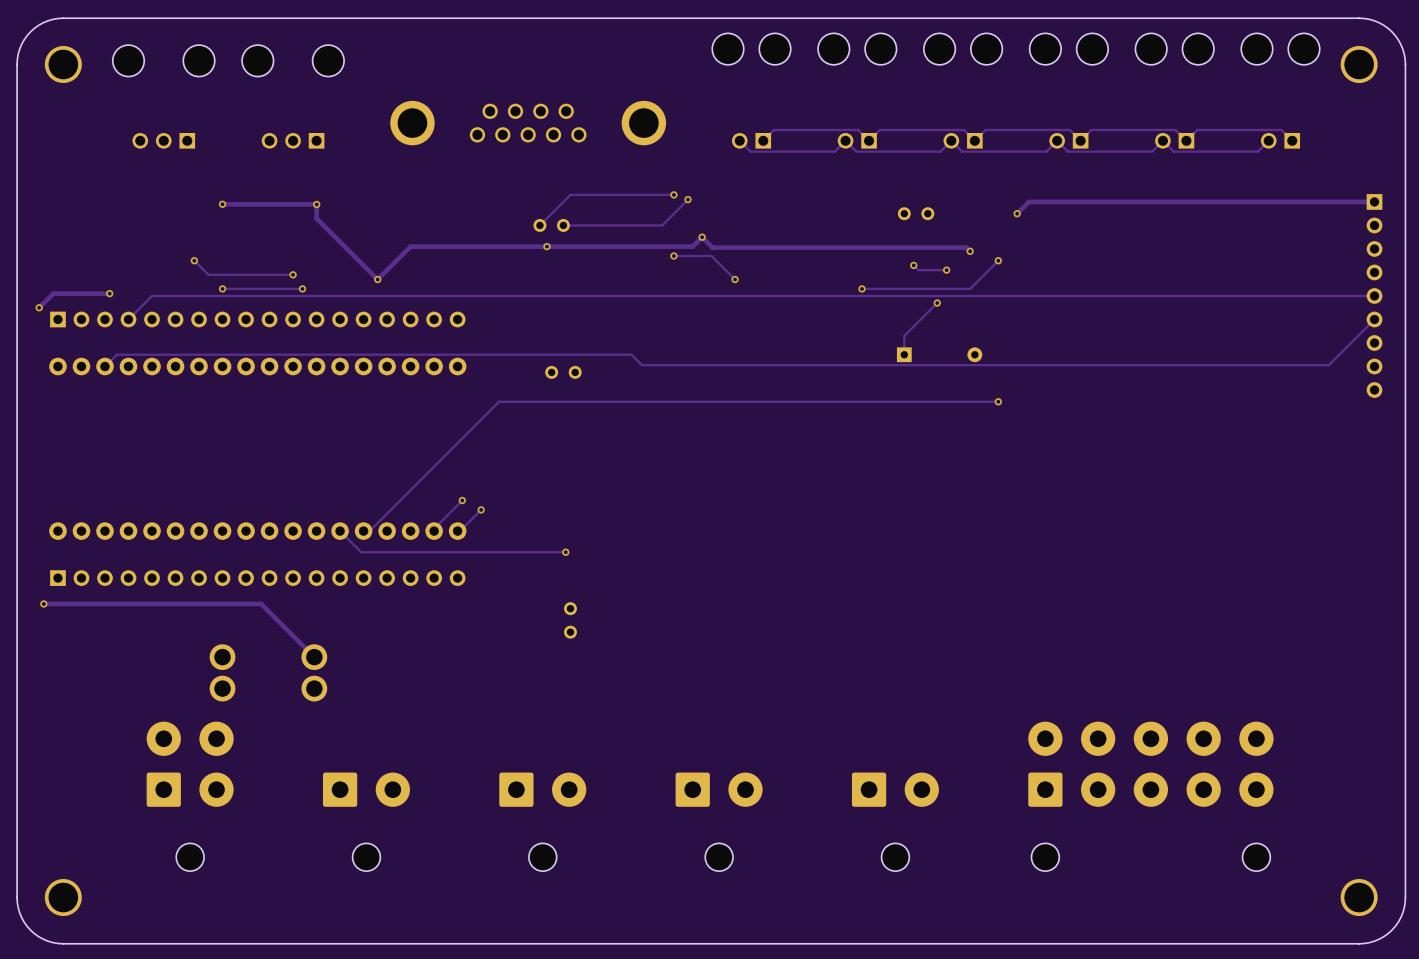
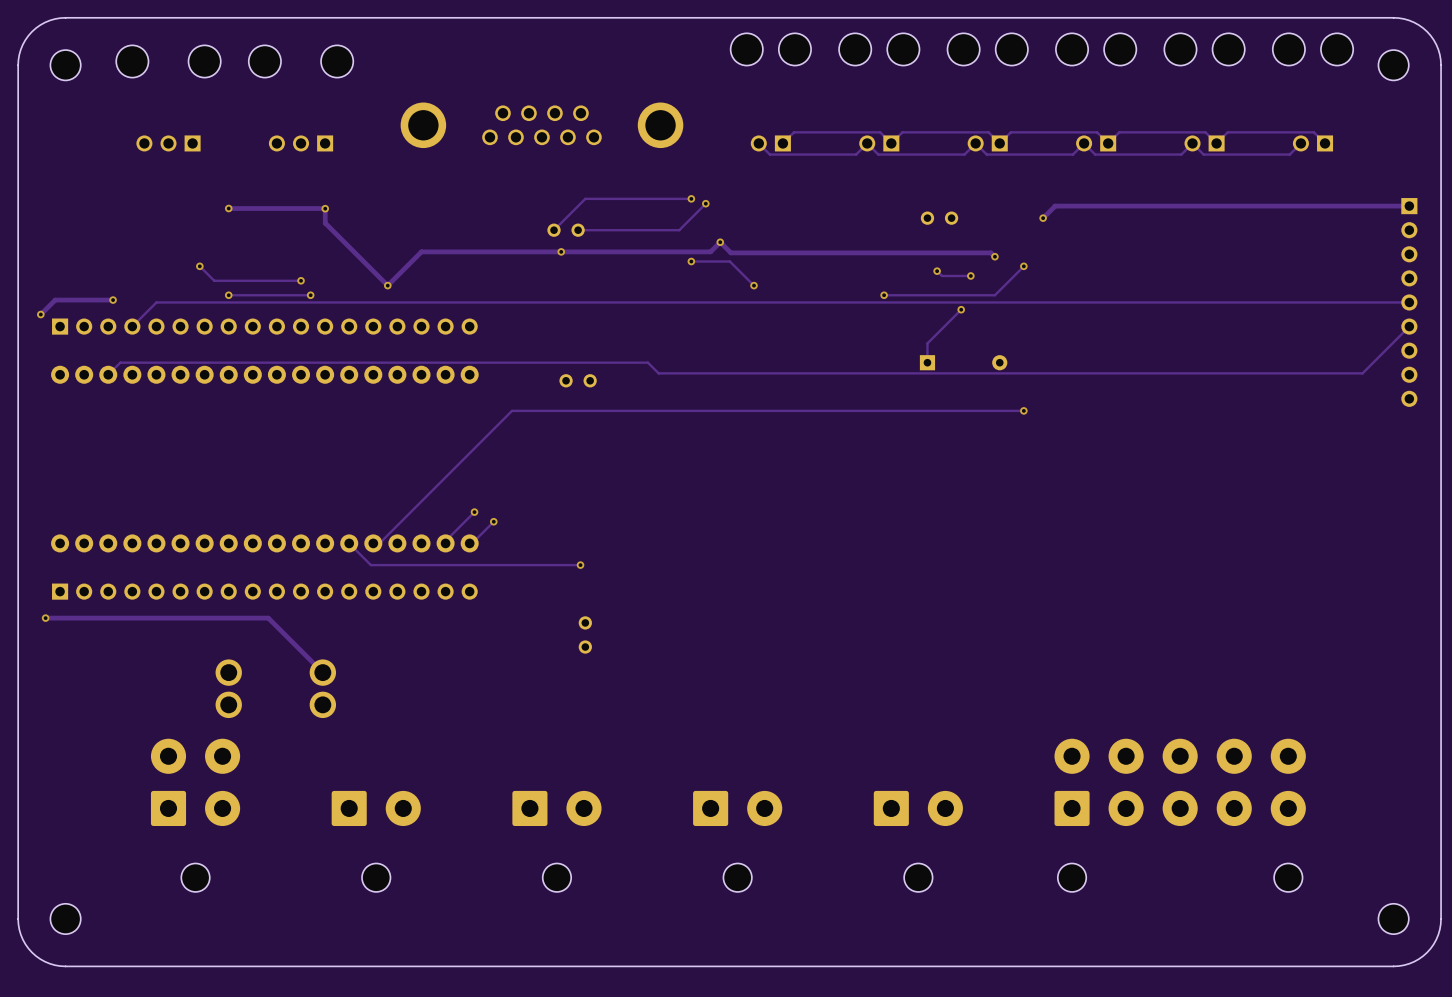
part footprint: [44, 45, 82, 84] -> [50, 50, 81, 81]
part footprint: [1340, 45, 1378, 84] -> [1378, 50, 1409, 81]
part footprint: [44, 879, 82, 917] -> [50, 903, 81, 935]
part footprint: [1340, 879, 1378, 917] -> [1378, 903, 1409, 935]

